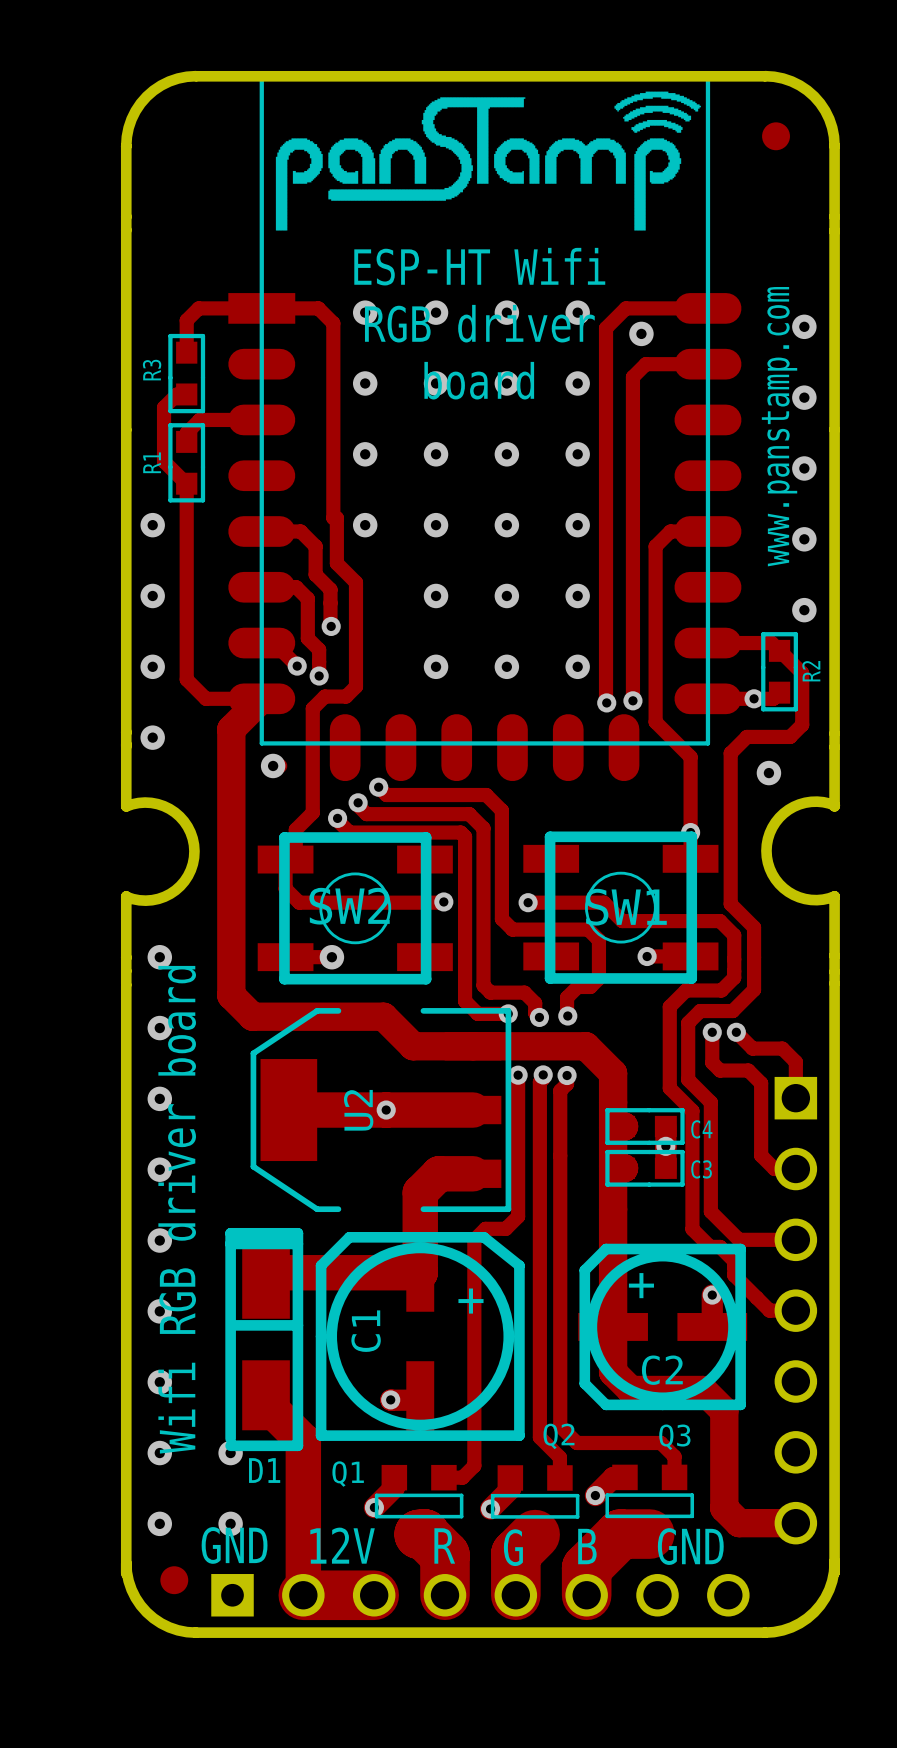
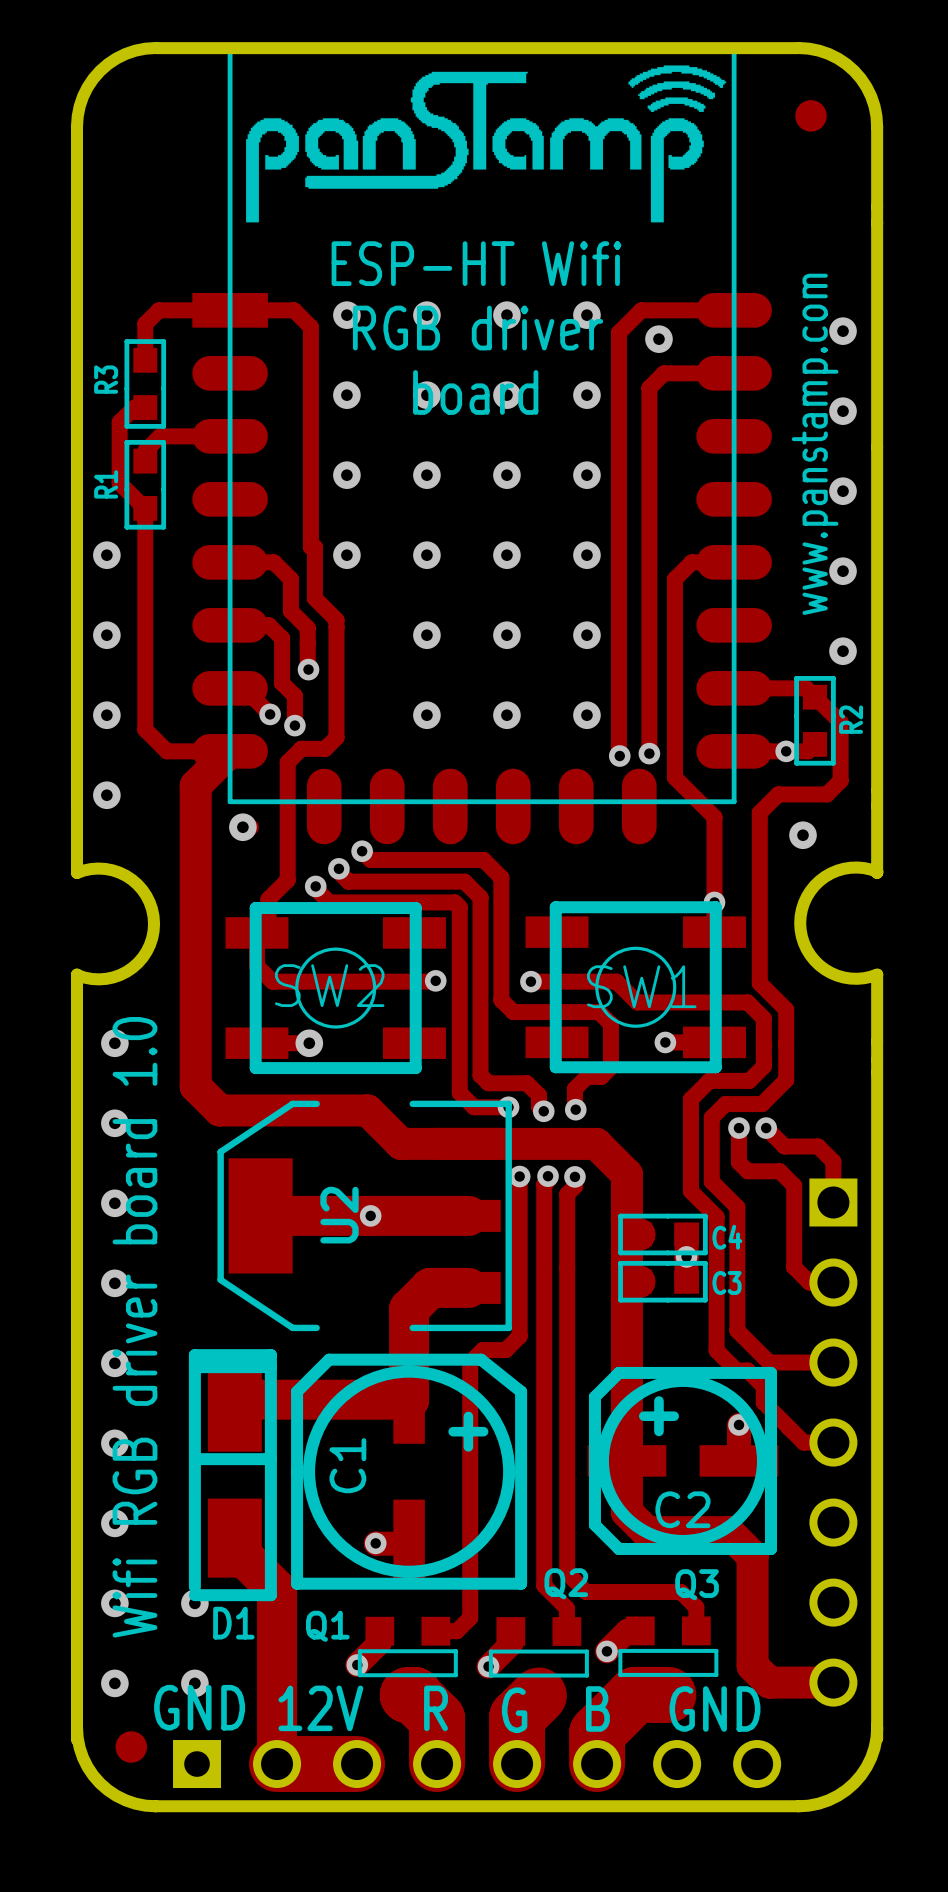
text: Wifi RGB driver board (177, 1209) -> Wifi RGB driver board 1.0 (134, 1327)

